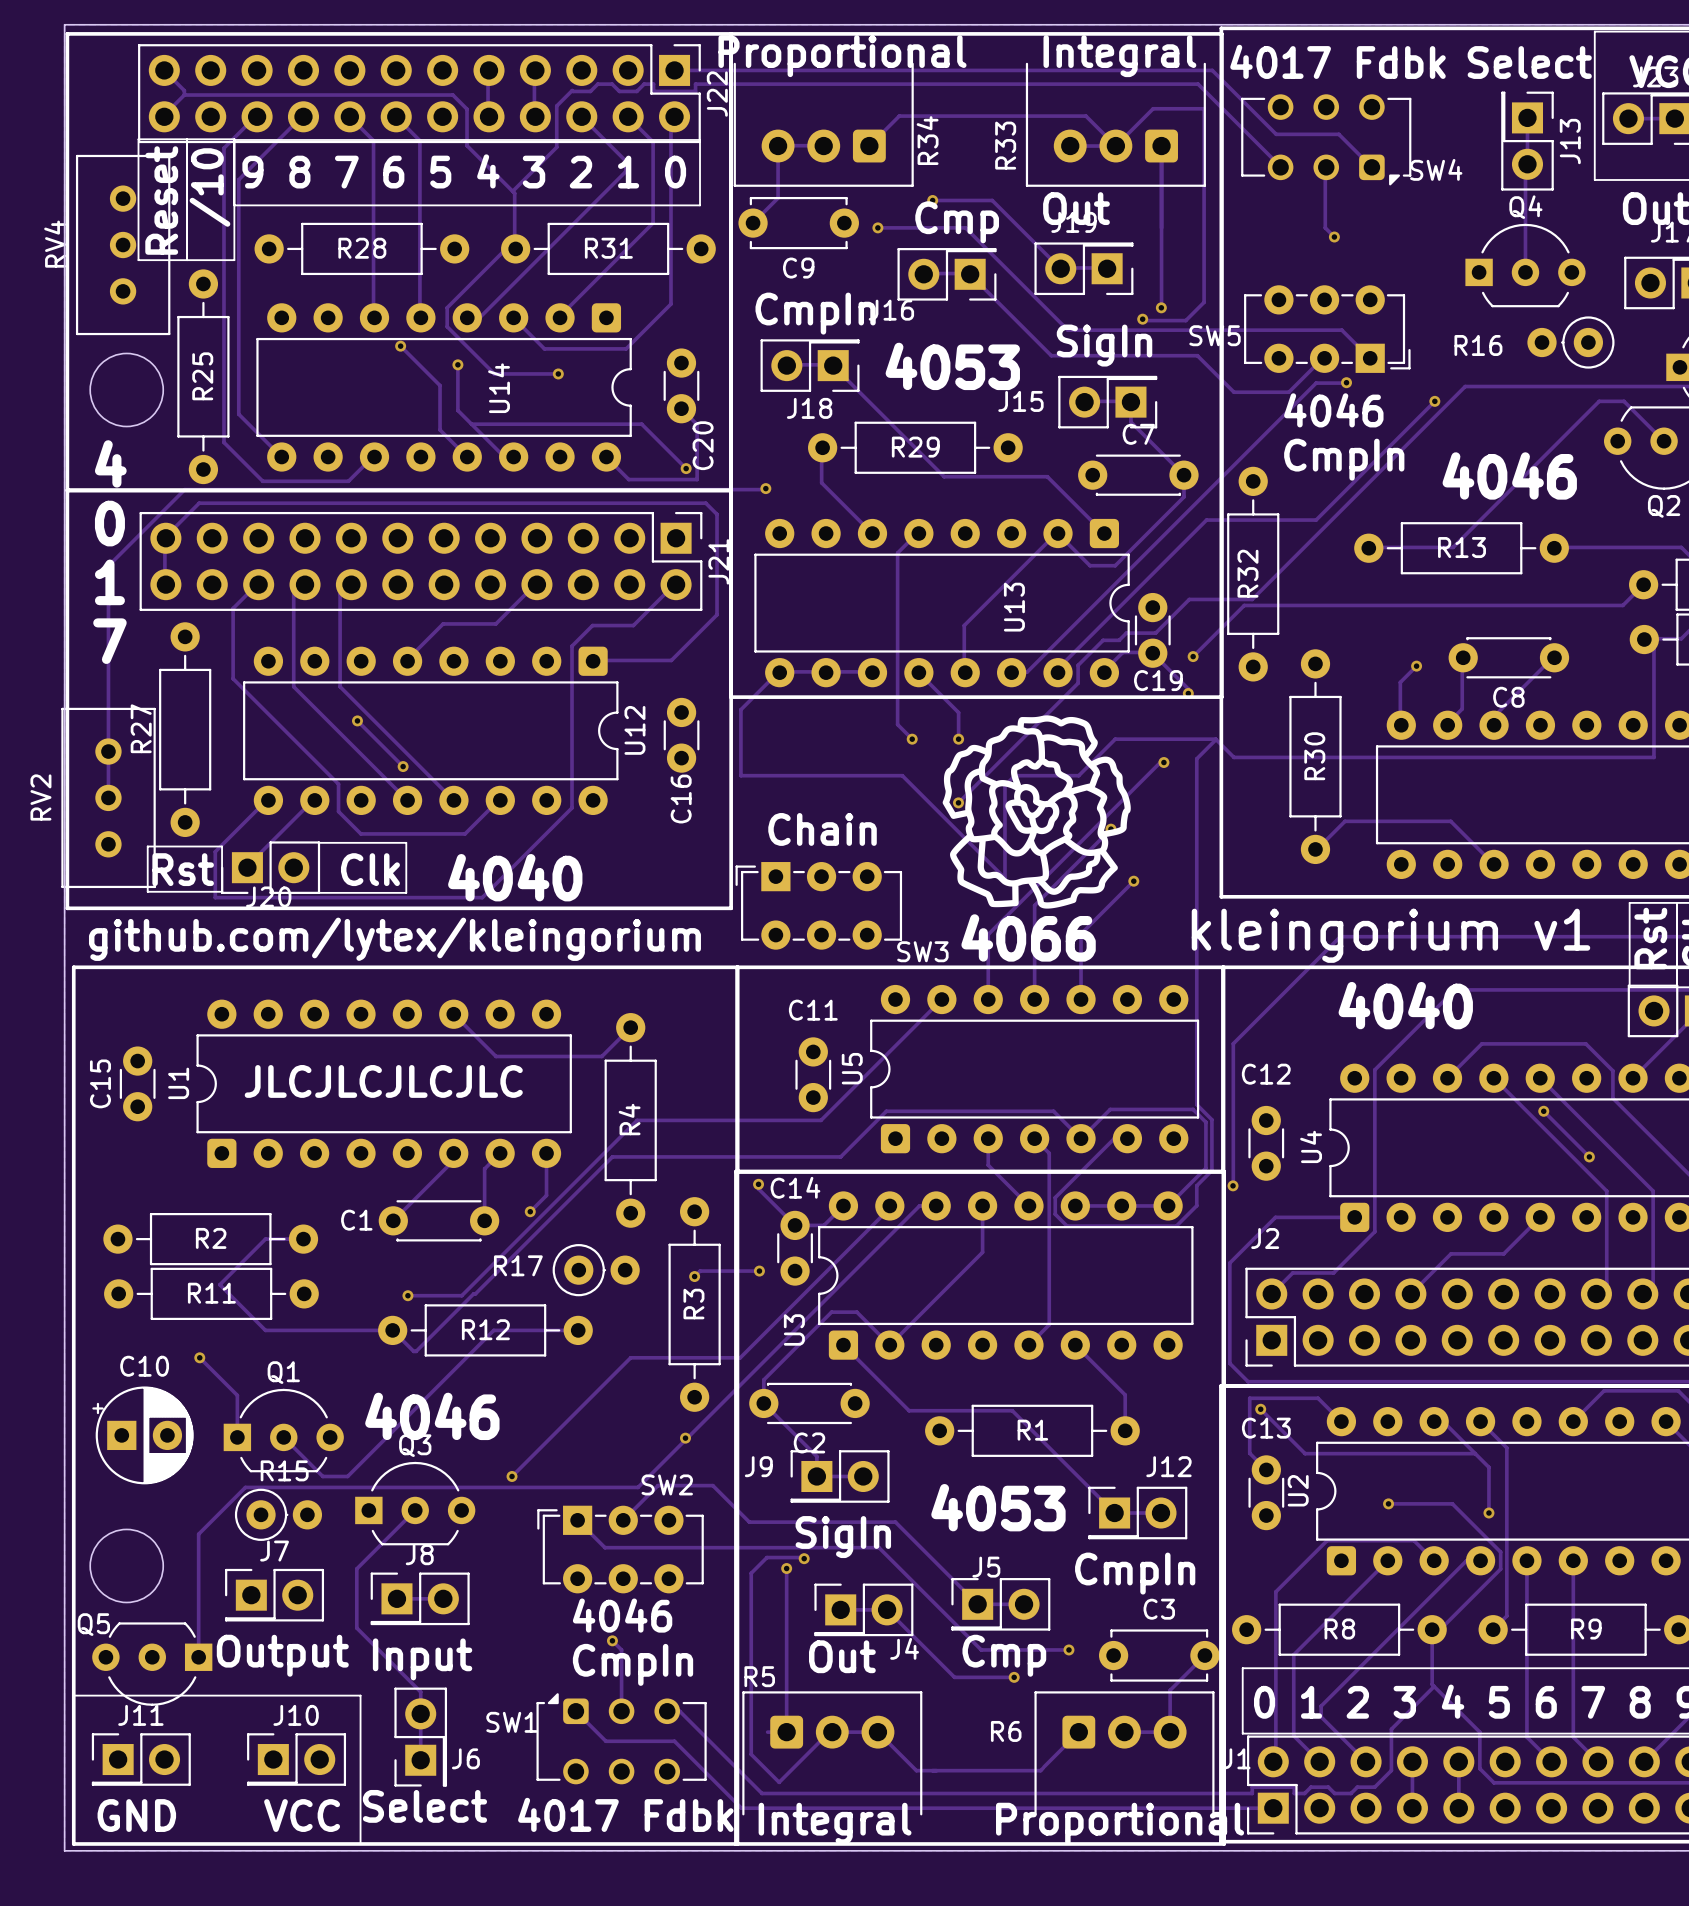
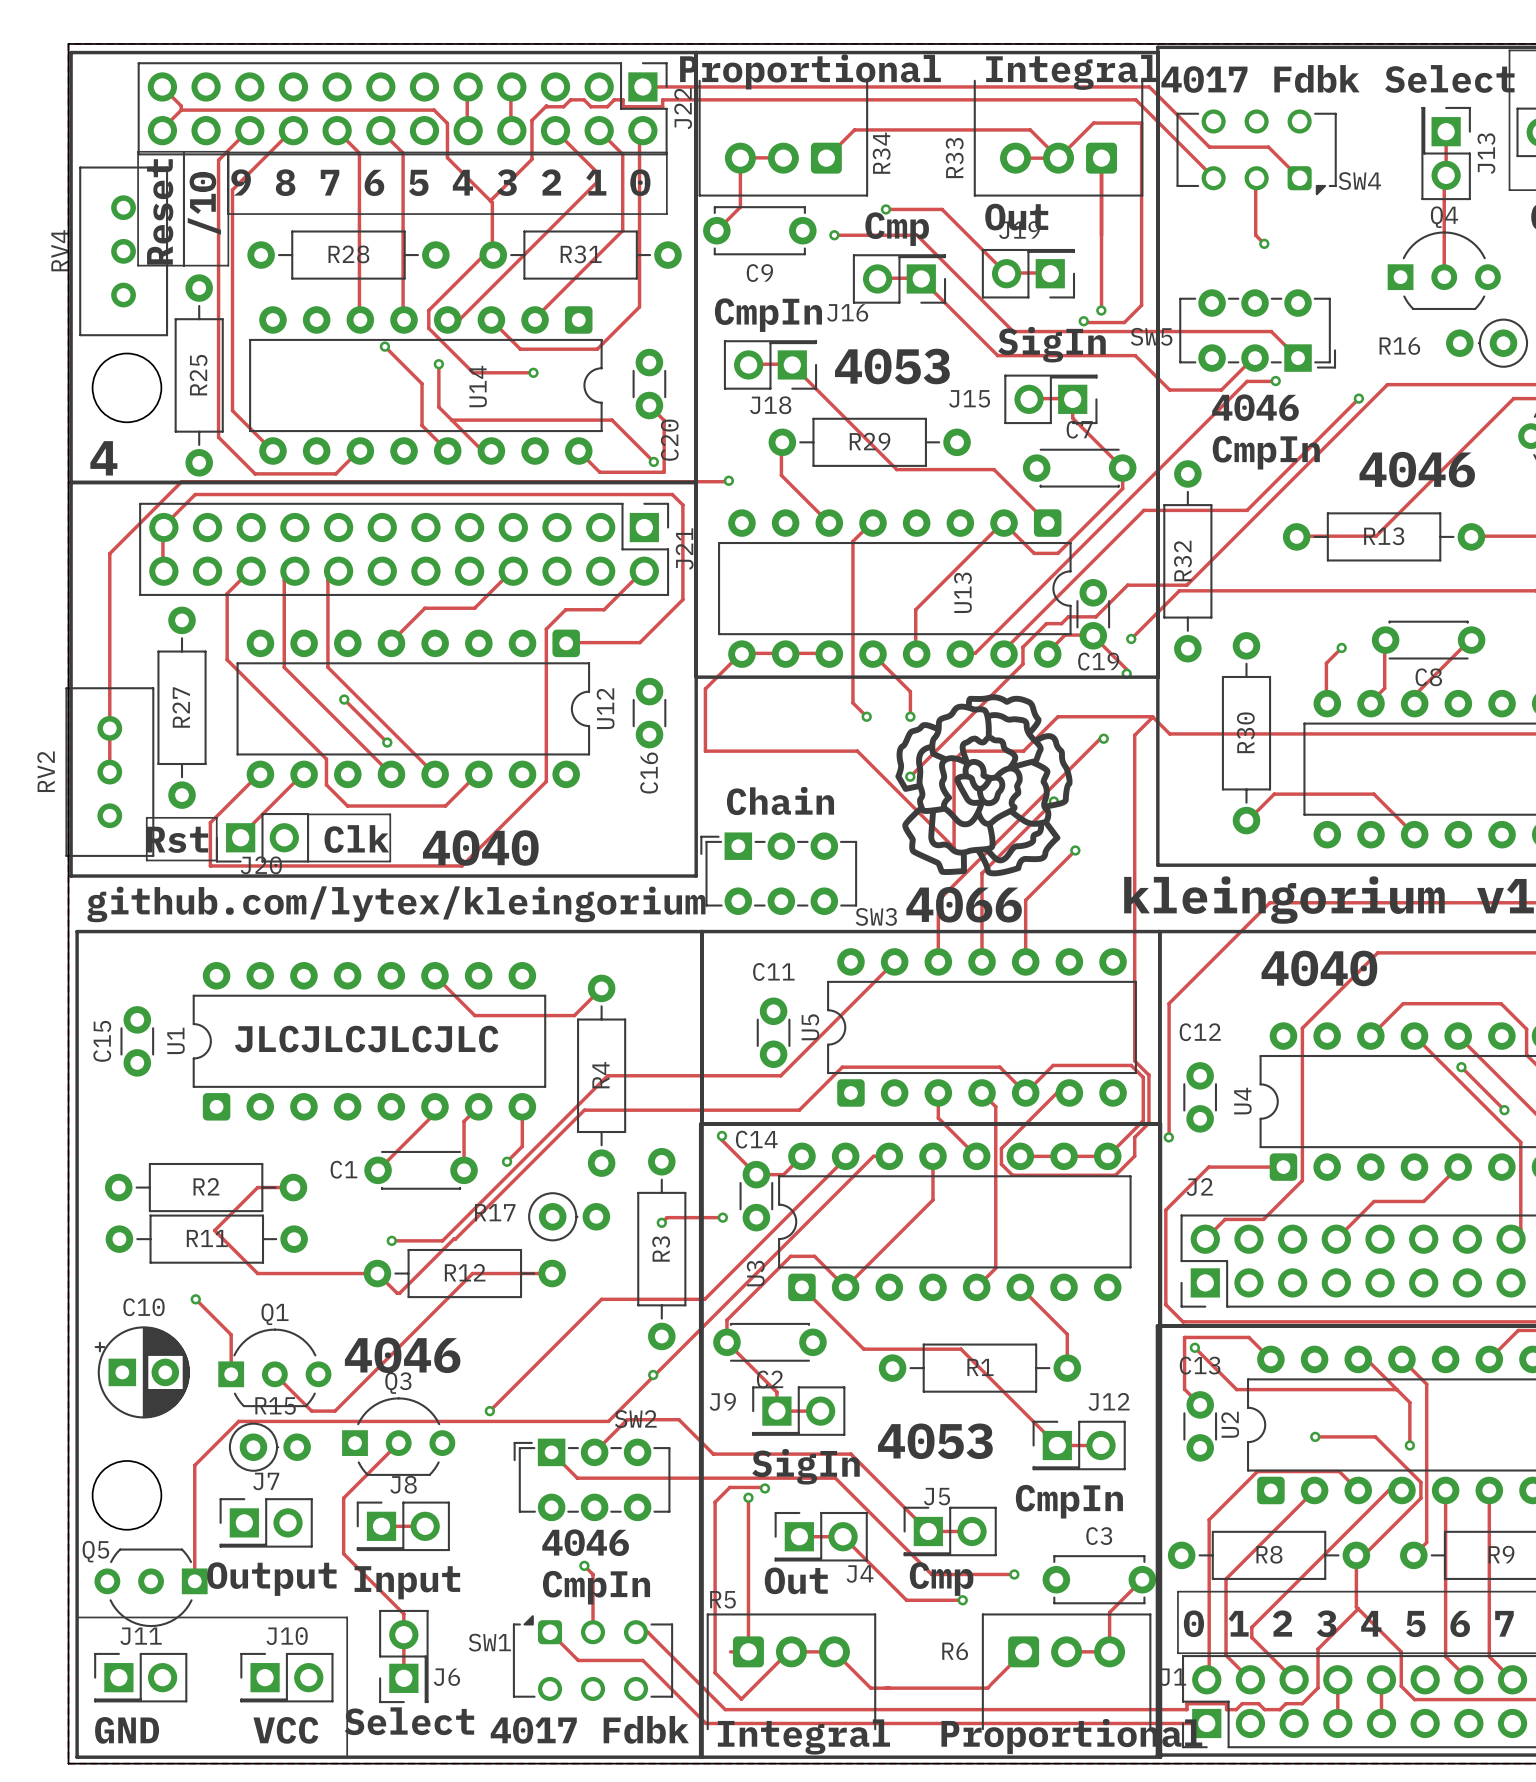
text: 0 (109, 523) -> none
text: 1 (109, 582) -> none
text: 7 (109, 641) -> none
R27 name position: R27 (141, 728) -> R27 (181, 707)

